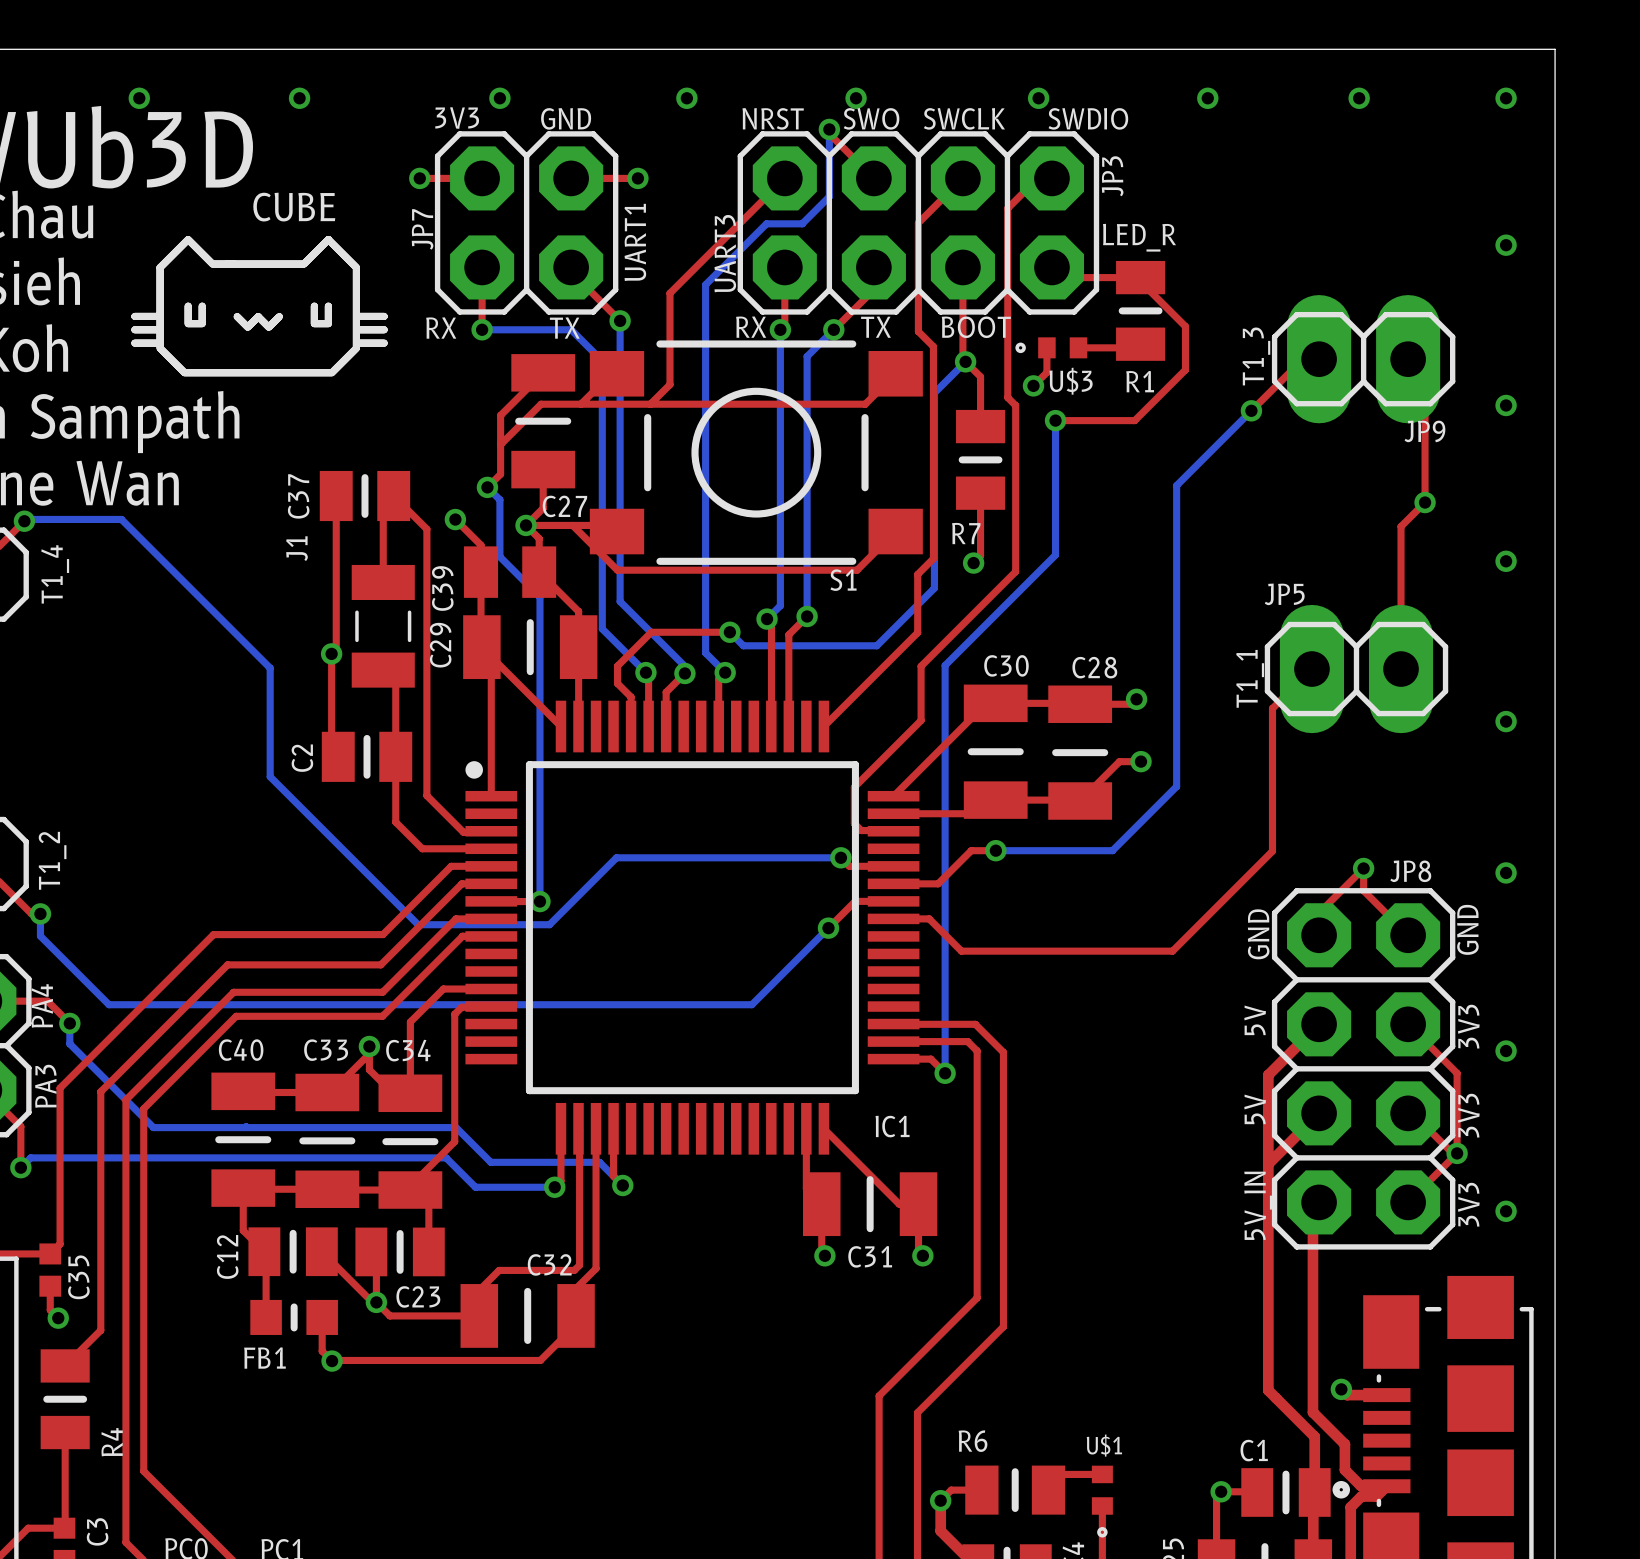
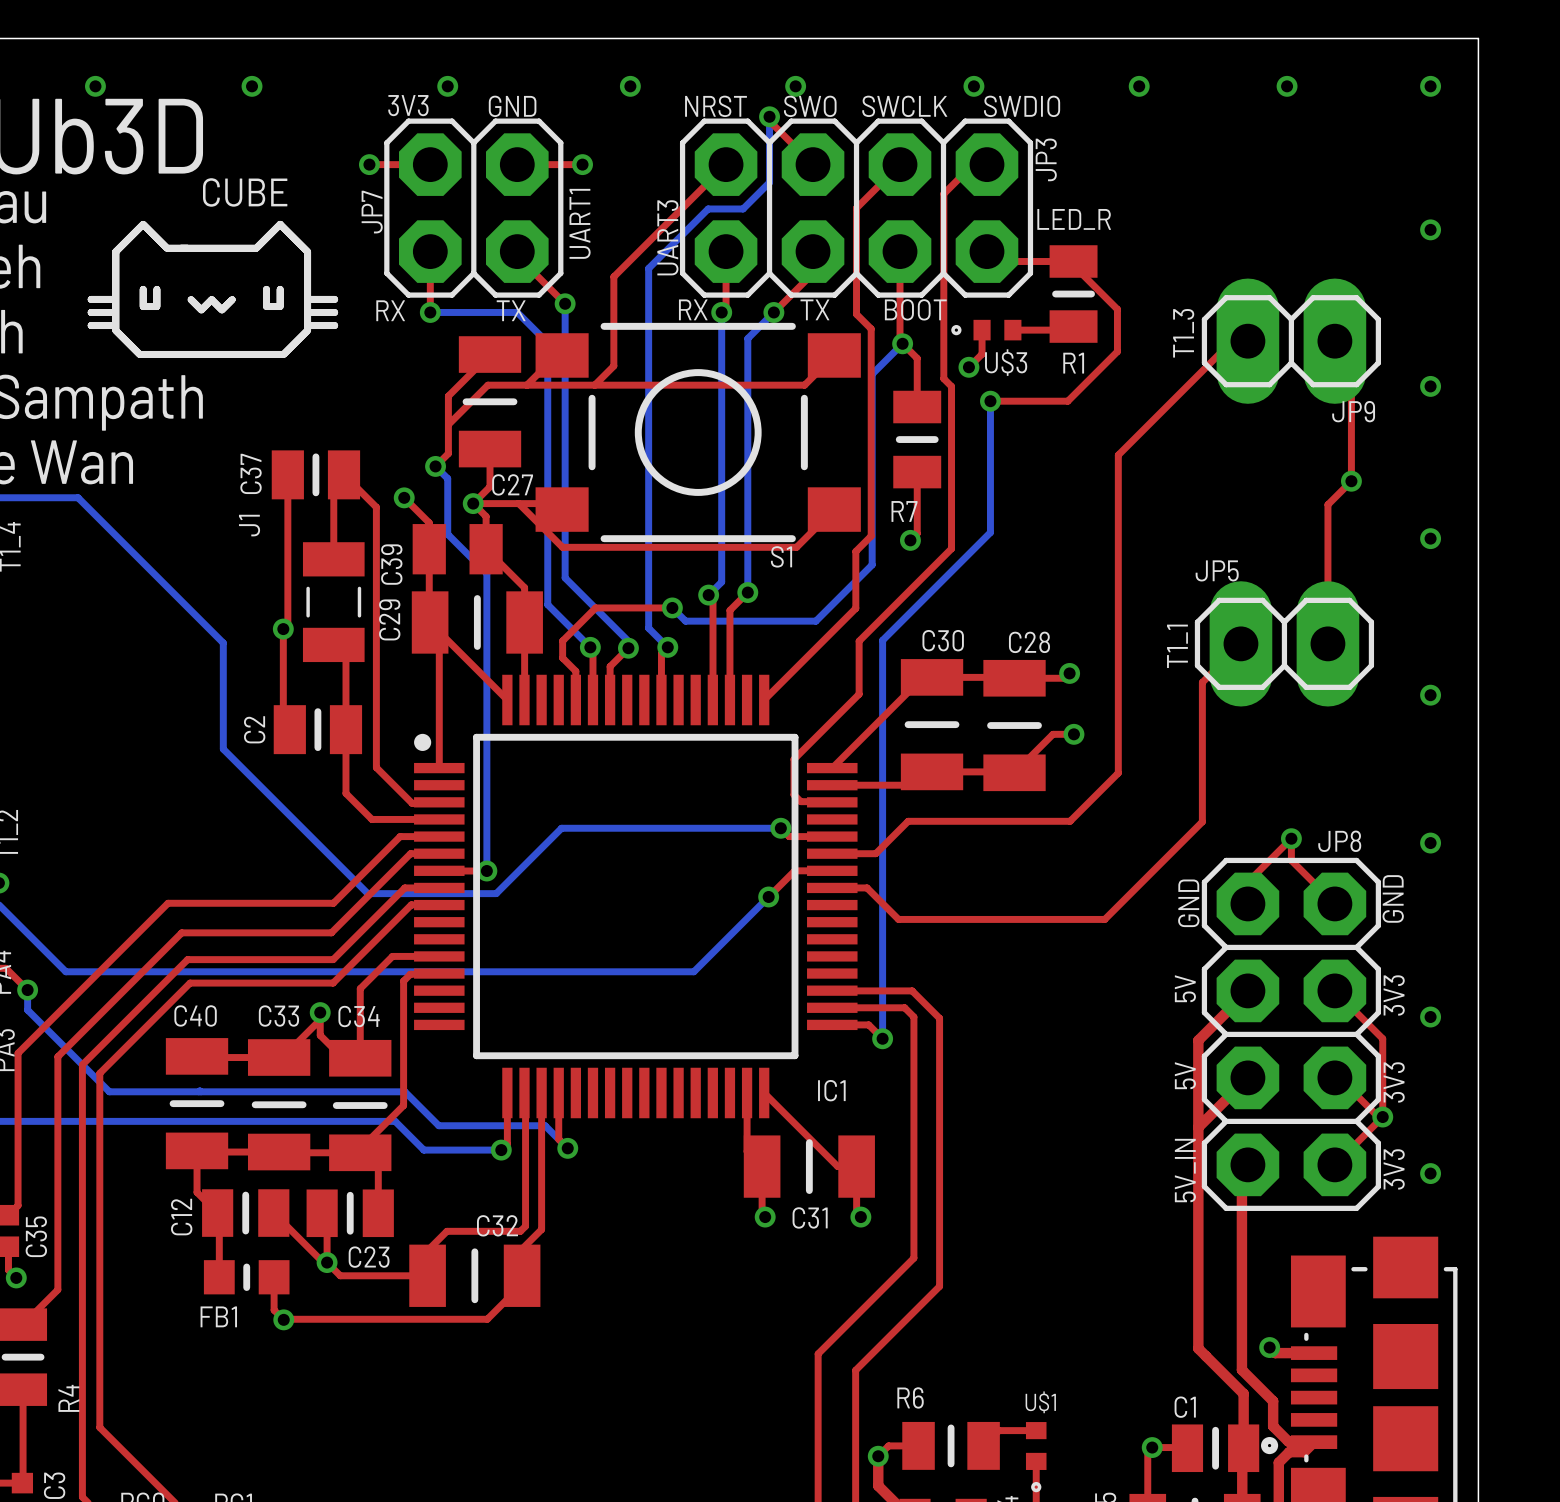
top track: none -> (1181, 391) (1118, 455) (1118, 773) (1070, 821) (932, 821)
bottom track: (1251, 410) (1176, 485) (1176, 786) (1112, 850) (995, 850) -> none
via: (1251, 410) -> none
via: (995, 850) -> none

